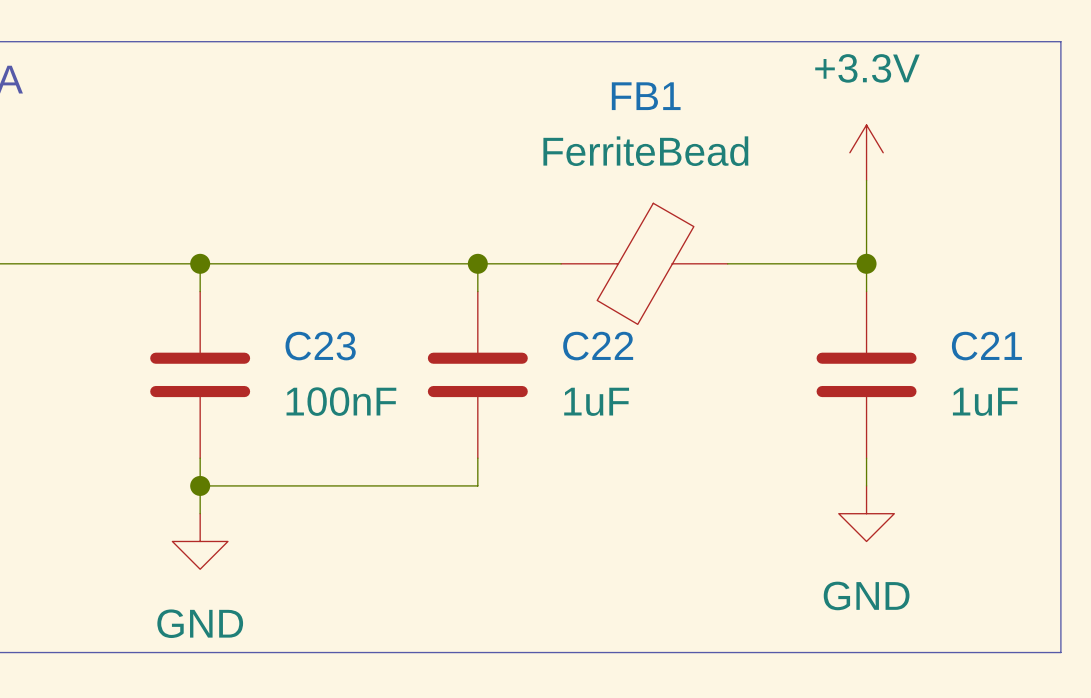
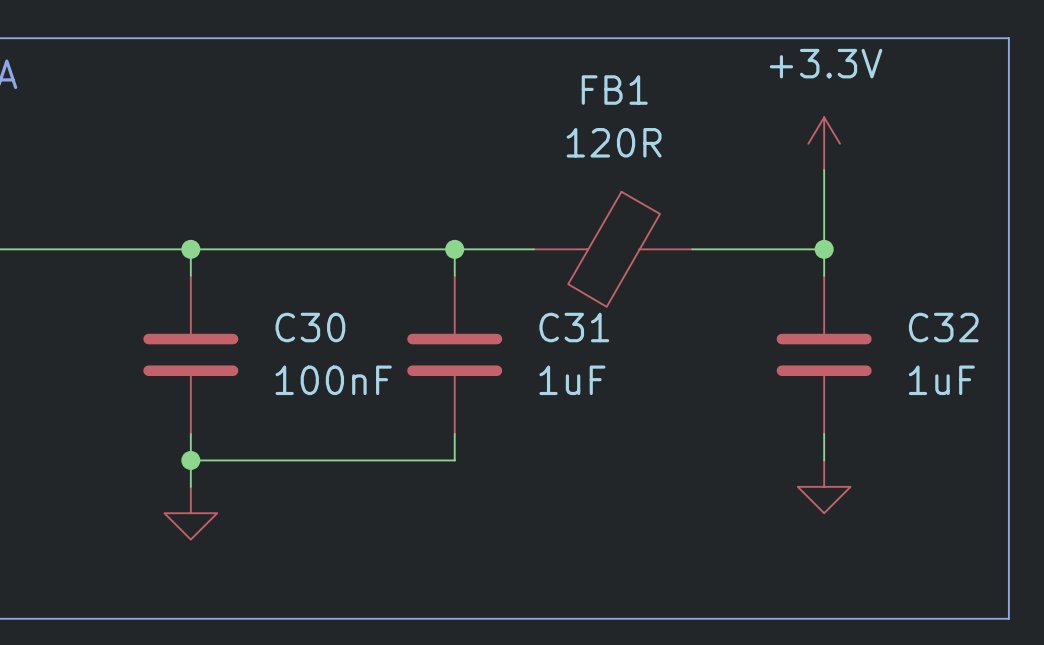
FB1 value: FerriteBead (645, 151) -> 120R (614, 142)
C23 name: C23 (320, 346) -> C30 (310, 327)
C22 name: C22 (598, 346) -> C31 (574, 327)
C21 name: C21 (986, 346) -> C32 (943, 327)
power symbol text: GND (866, 595) -> none
power symbol text: GND (200, 623) -> none

